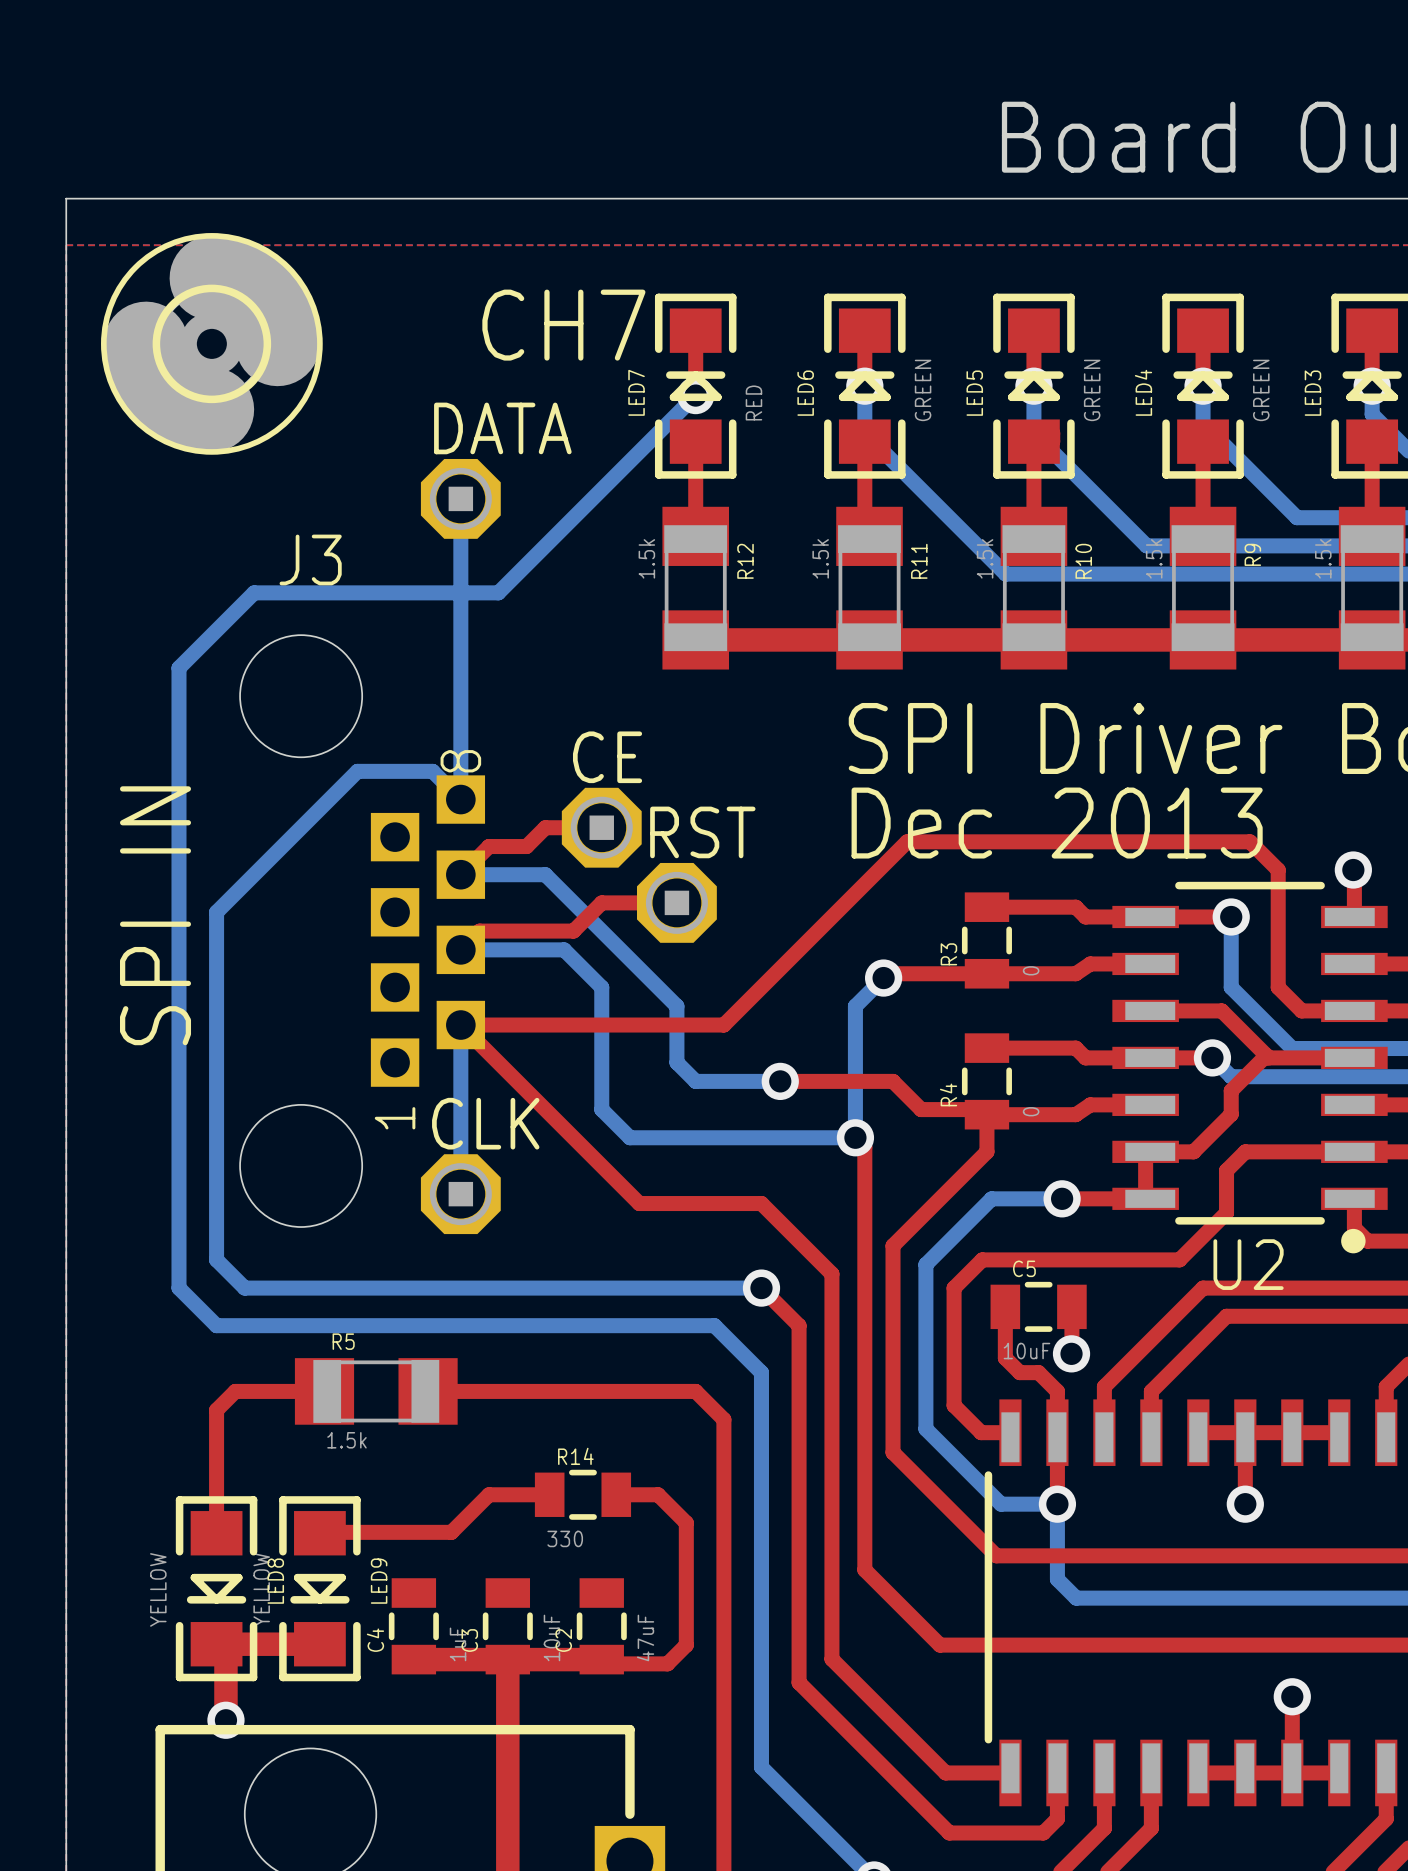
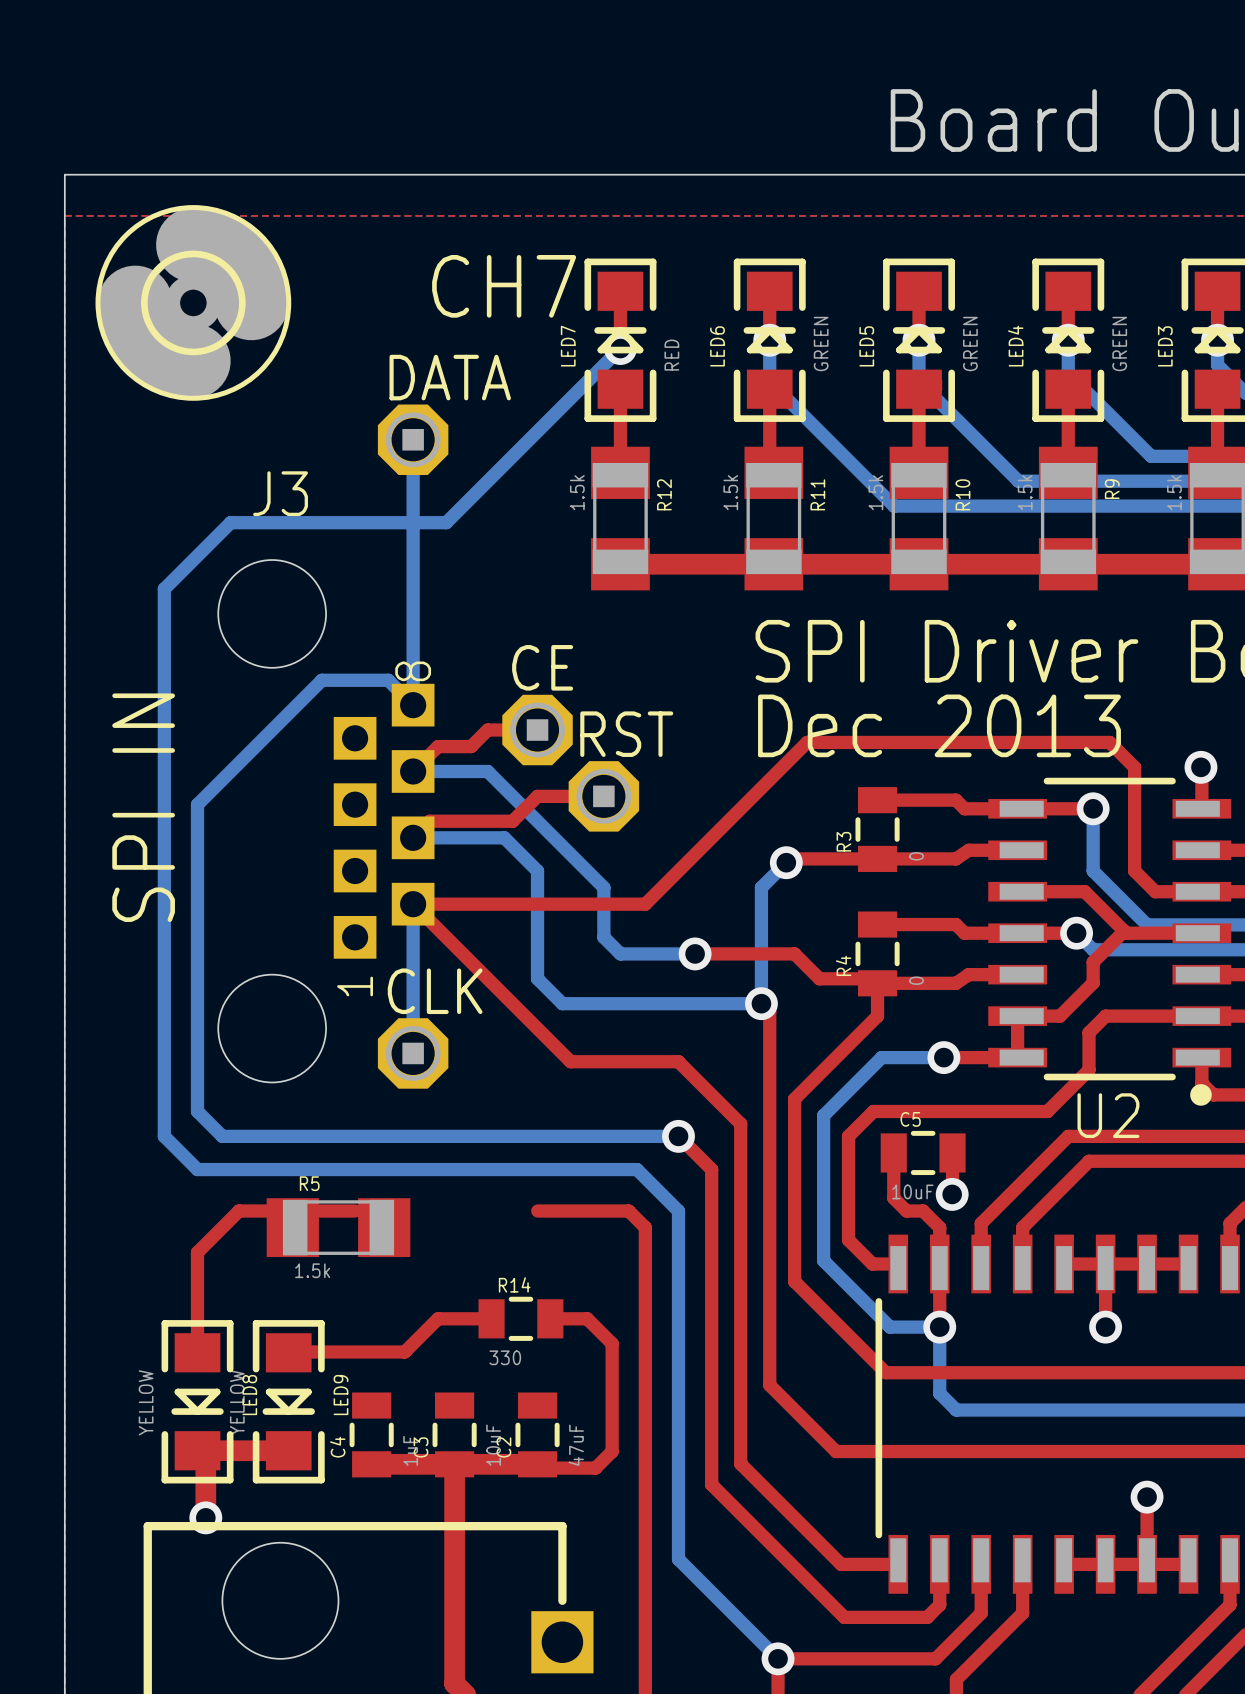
top track: (324, 1391) (235, 1391) (216, 1410) (216, 1419) -> (354, 1211) (238, 1211) (197, 1252)
top track: (428, 1391) (695, 1391) (723, 1419) -> (537, 1211) (628, 1211) (645, 1227) (645, 1252)

